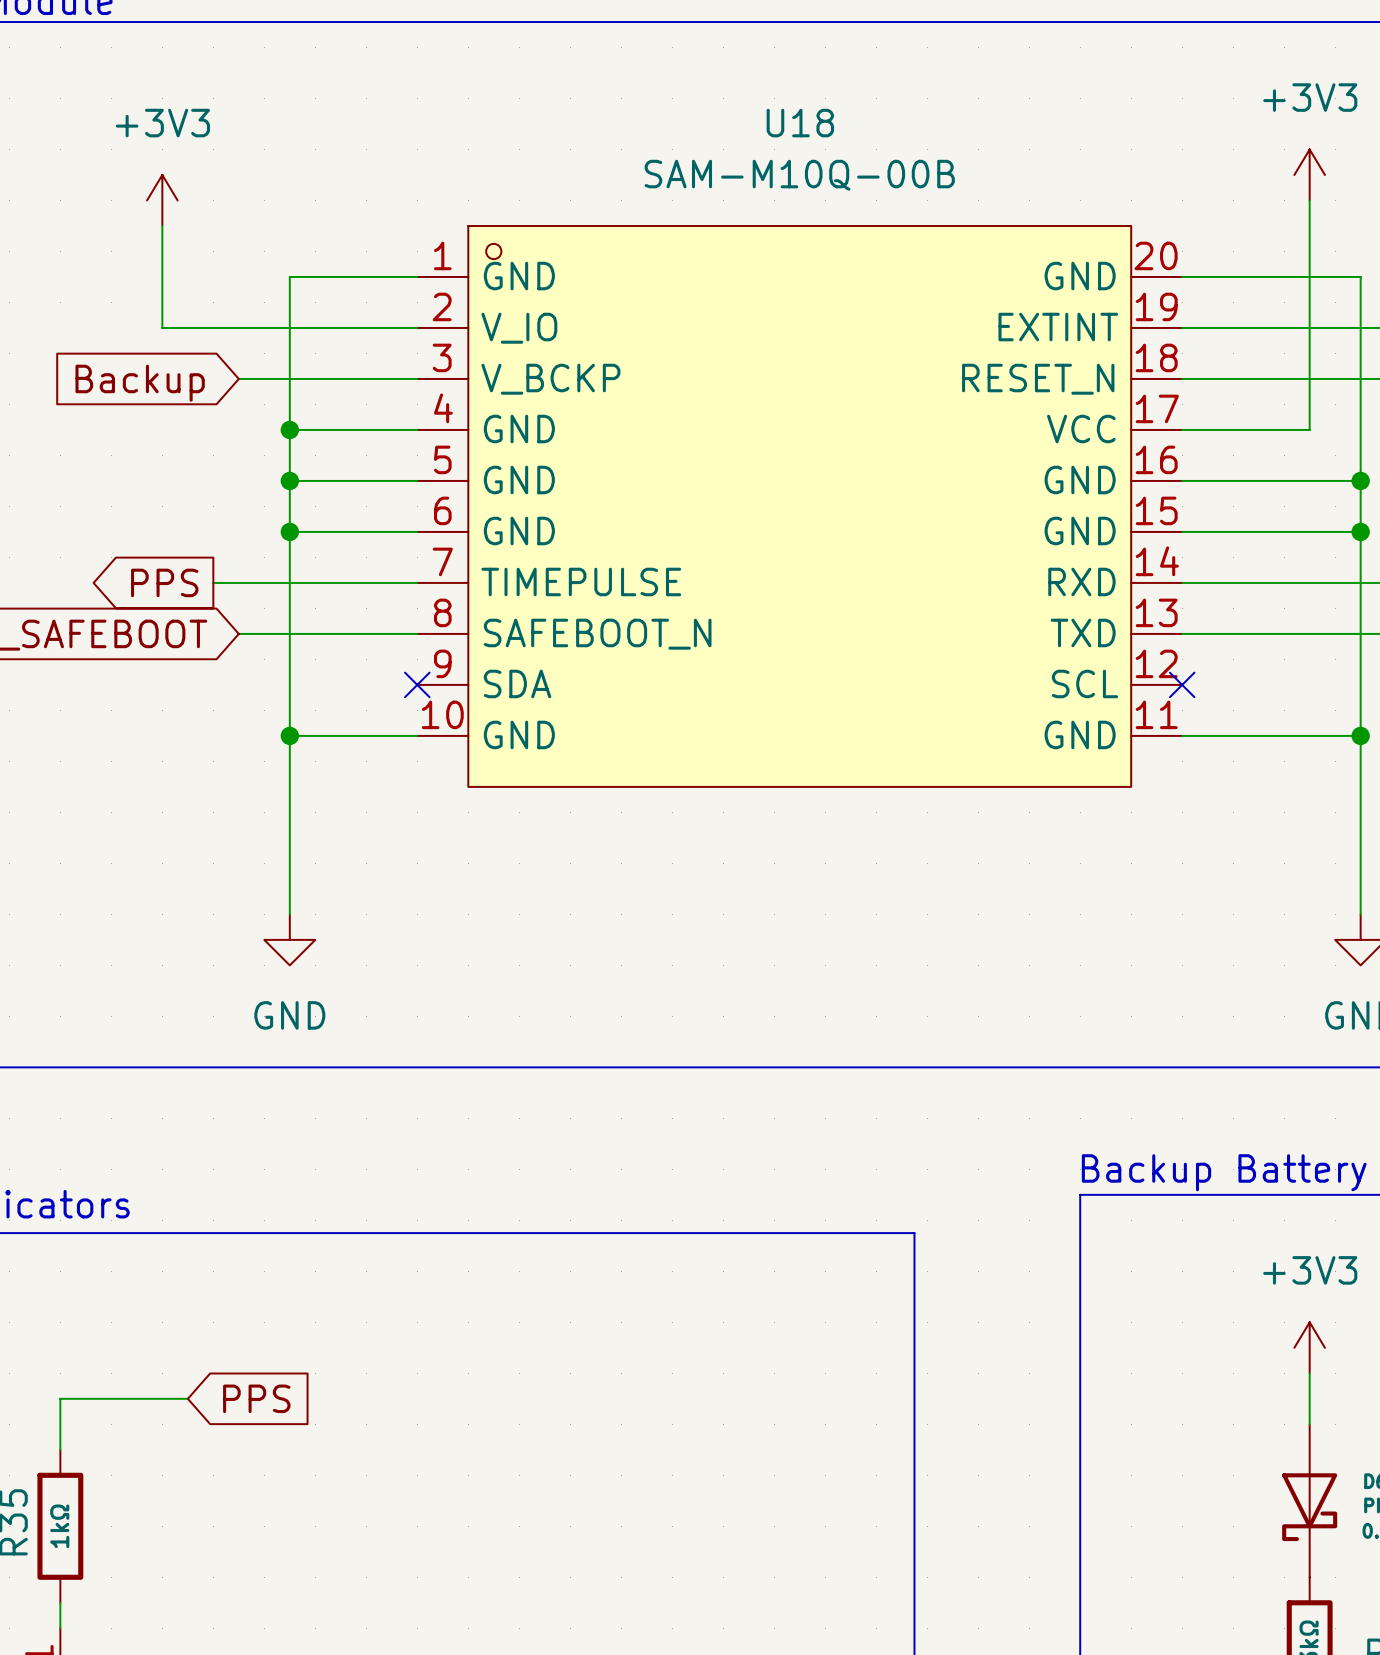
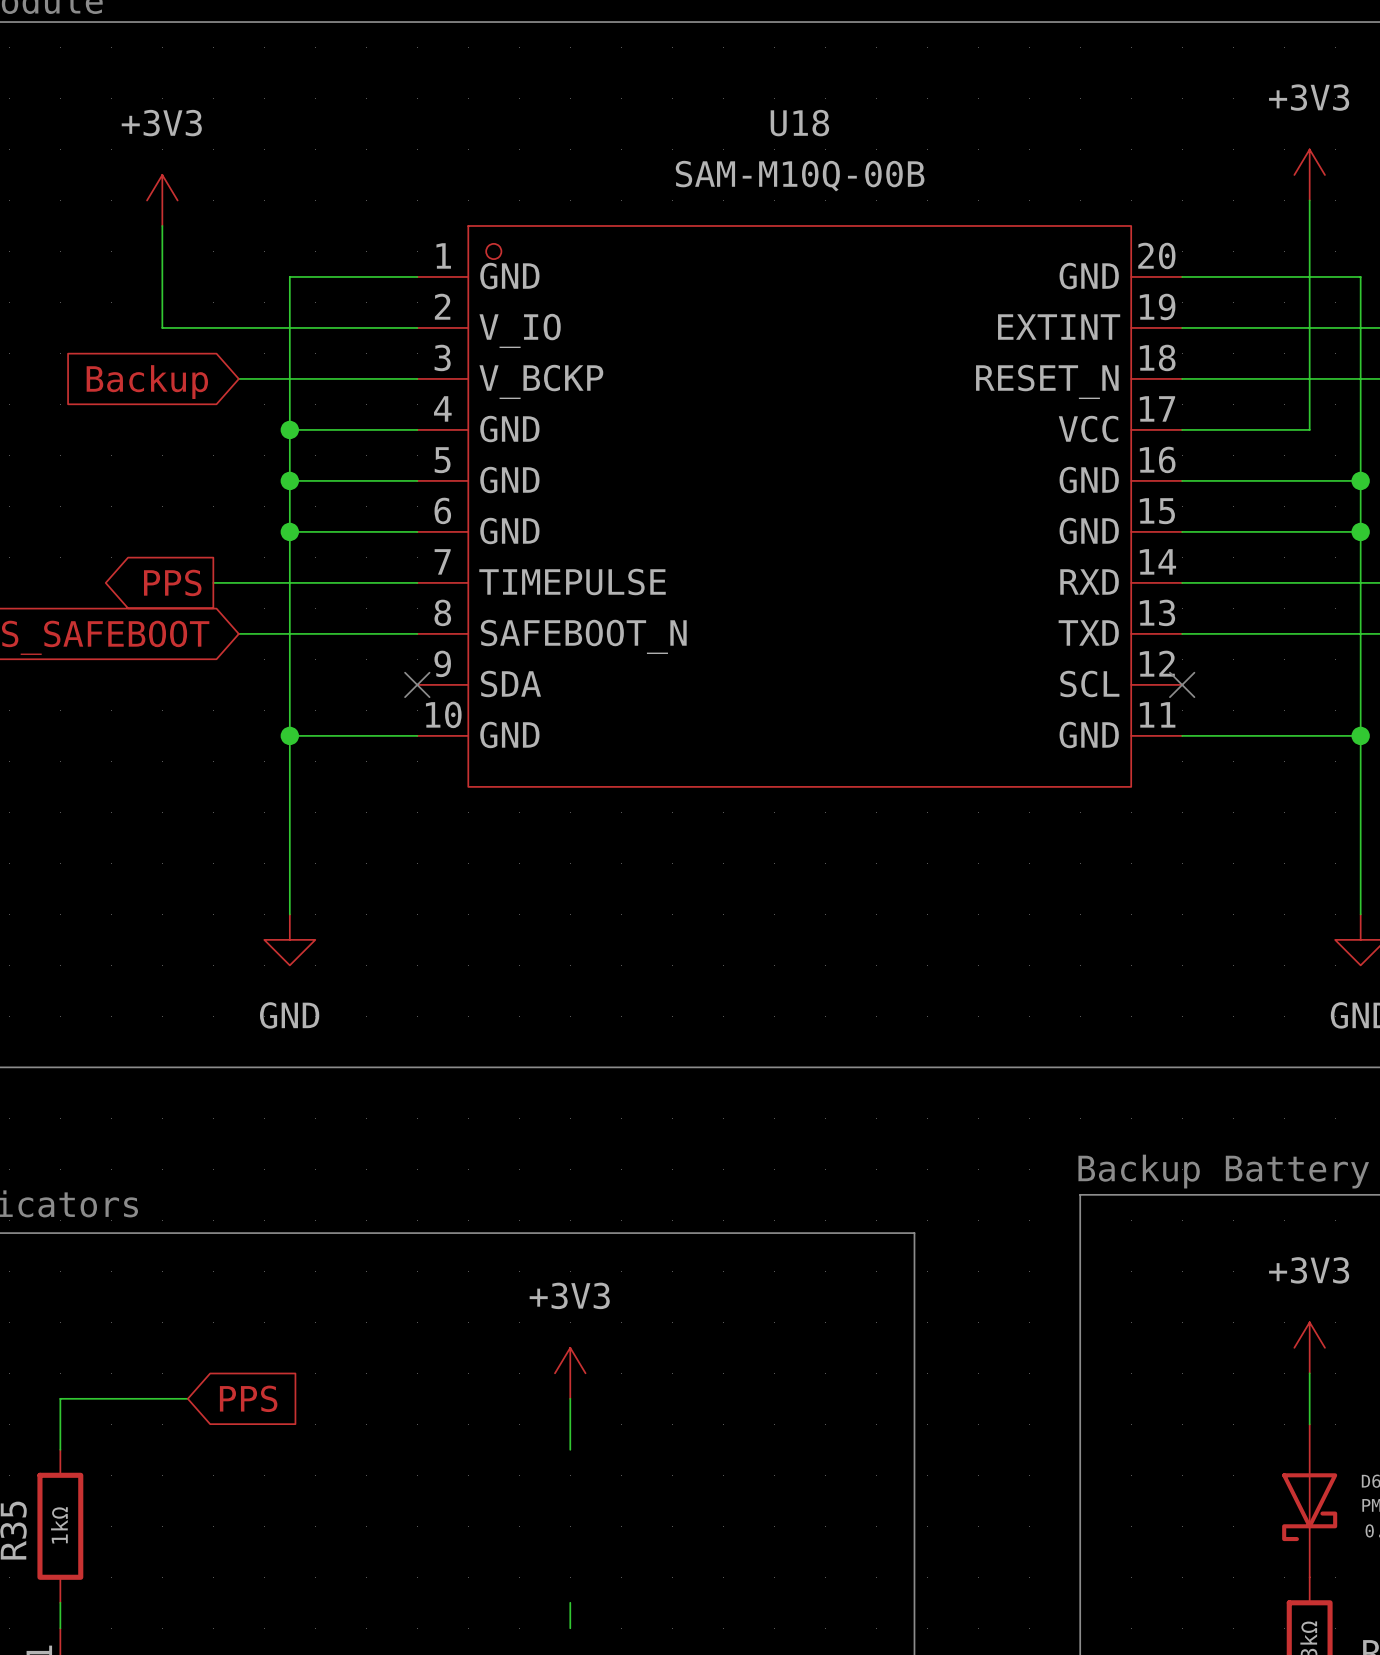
power symbol: none -> +3V3 (570, 1373)
wire: none -> (570, 1398) (570, 1449)
wire: none -> (570, 1602) (570, 1628)

